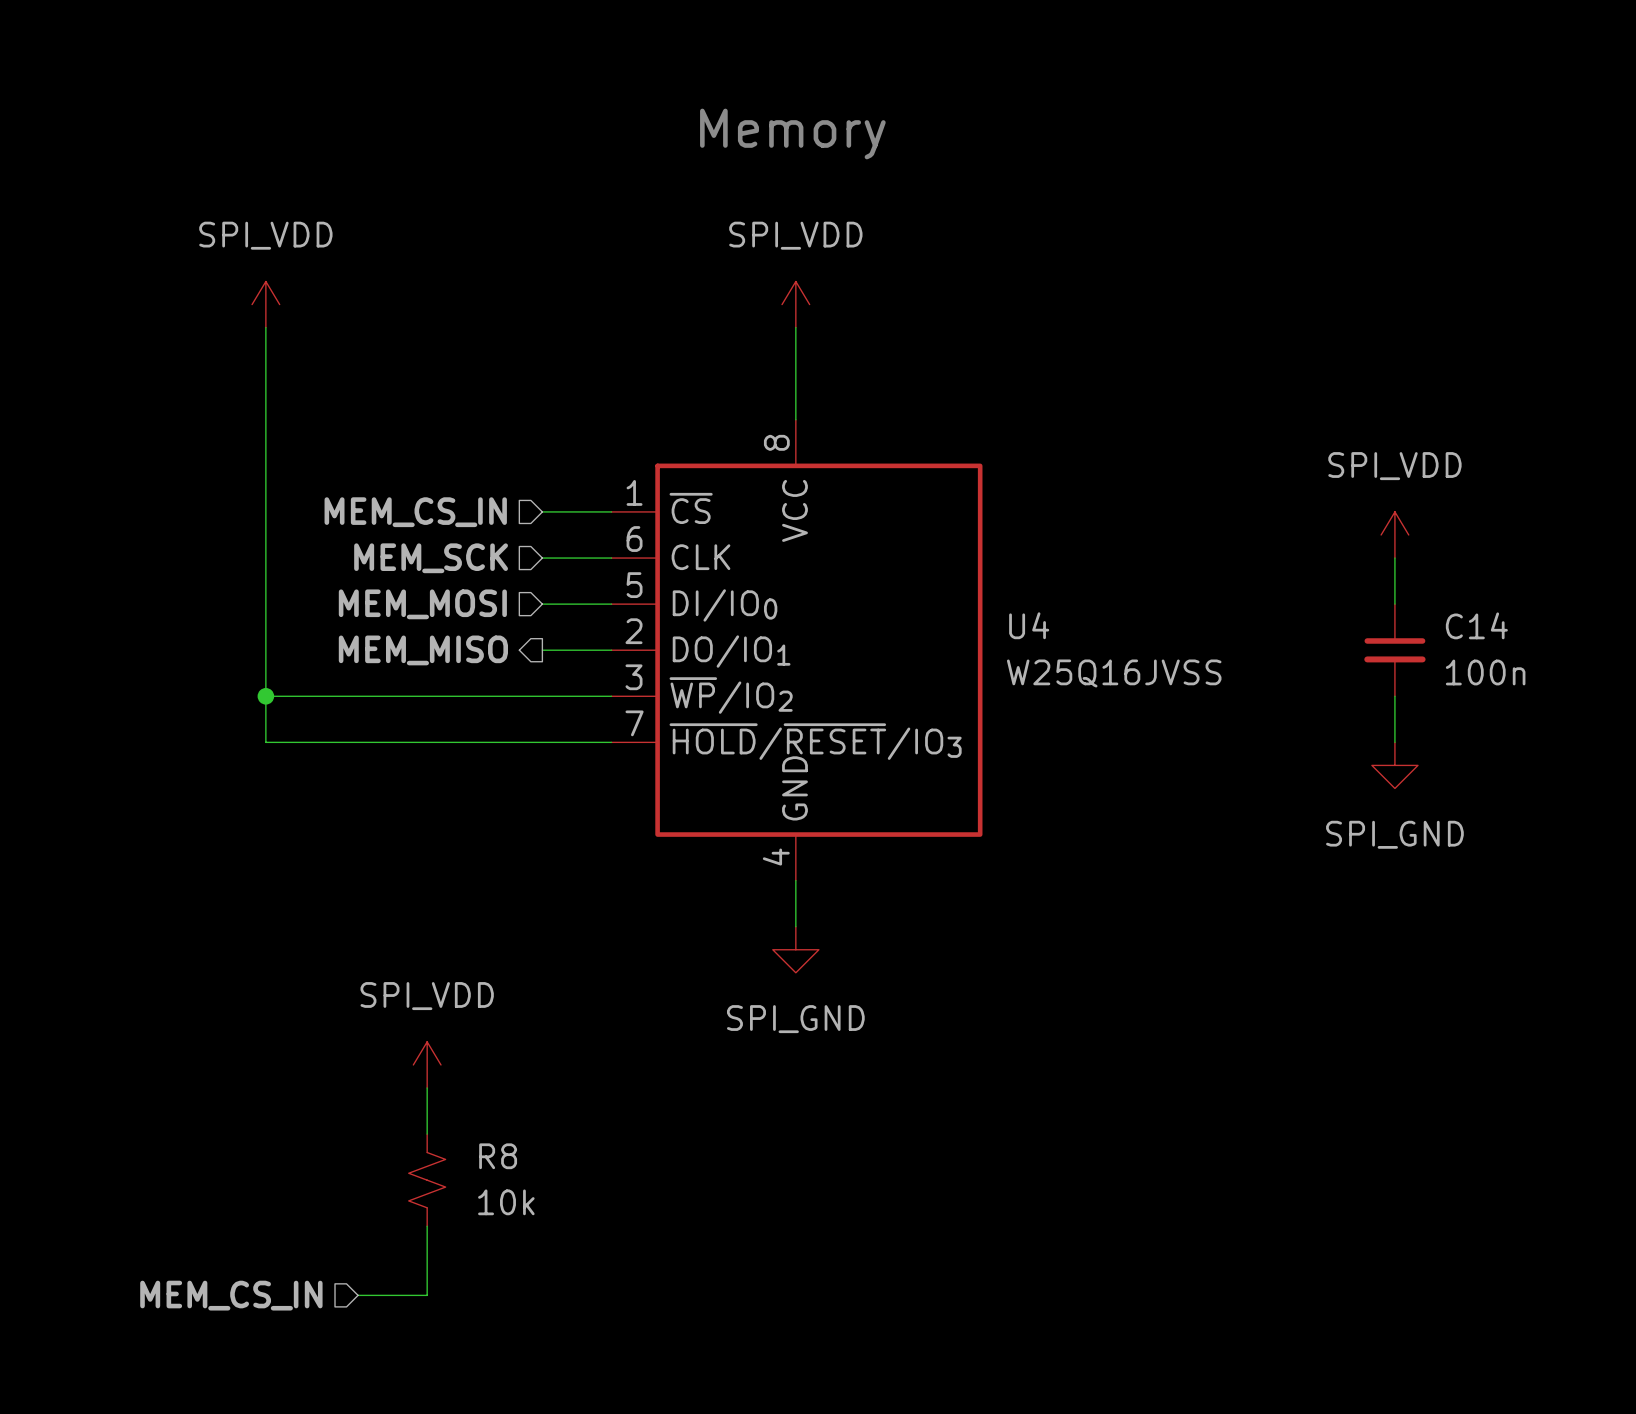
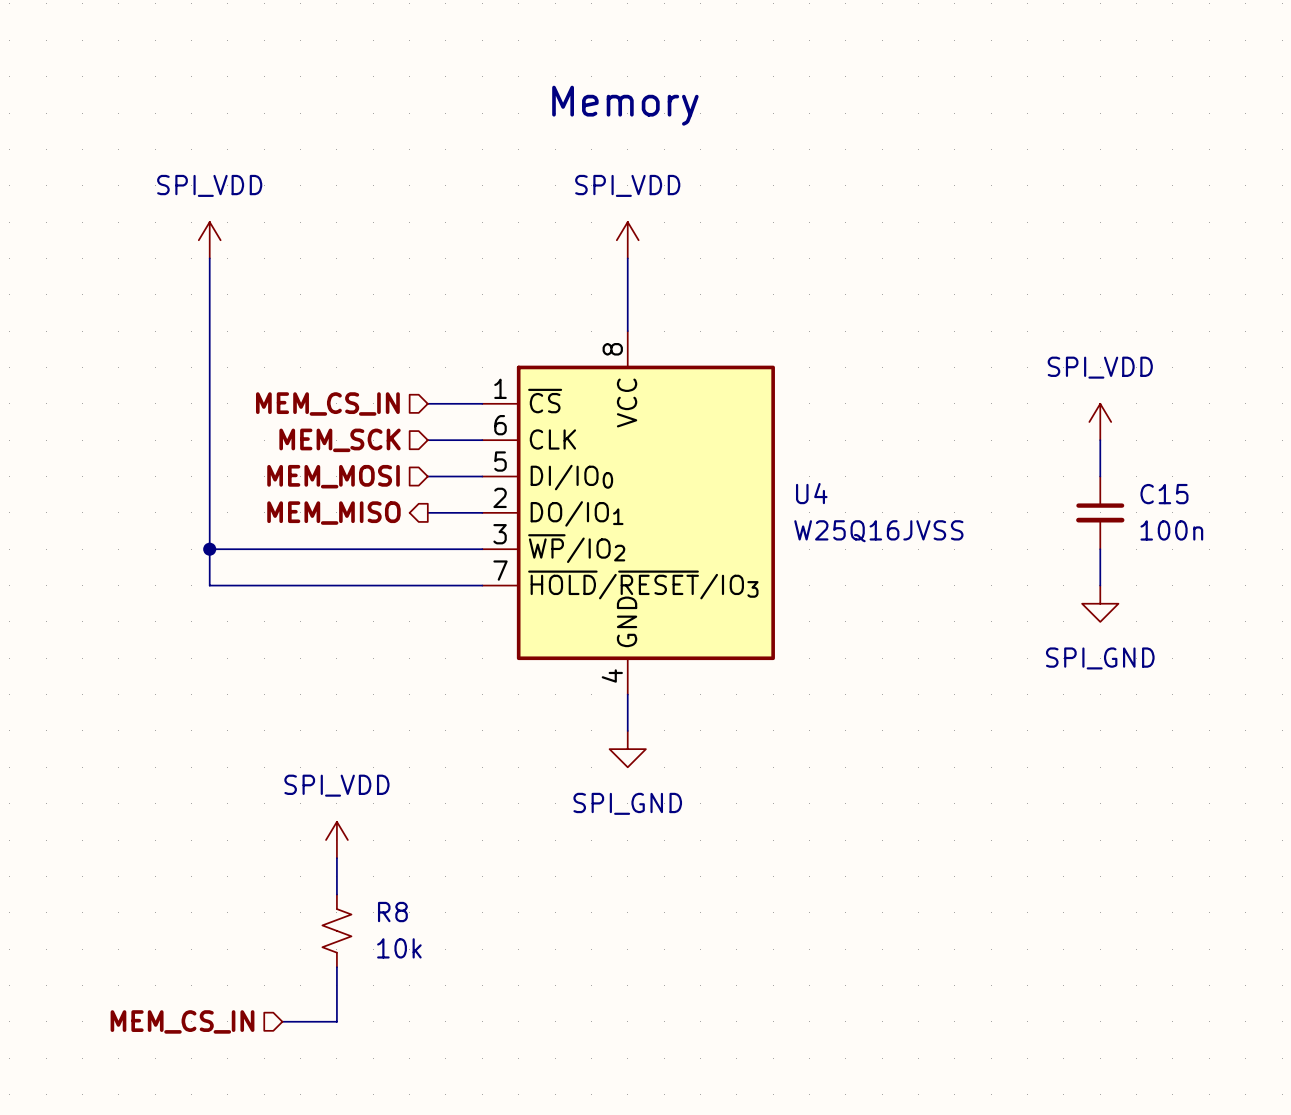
C14 name: C14 (1476, 625) -> C15 (1164, 494)

